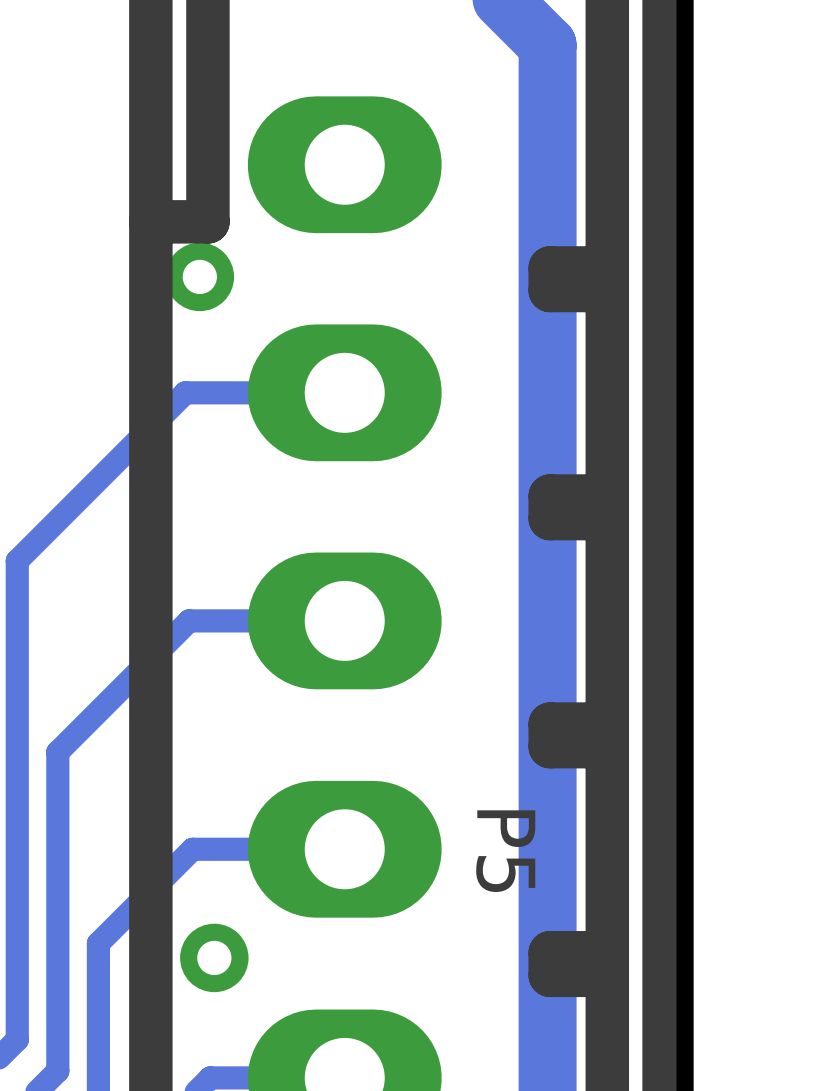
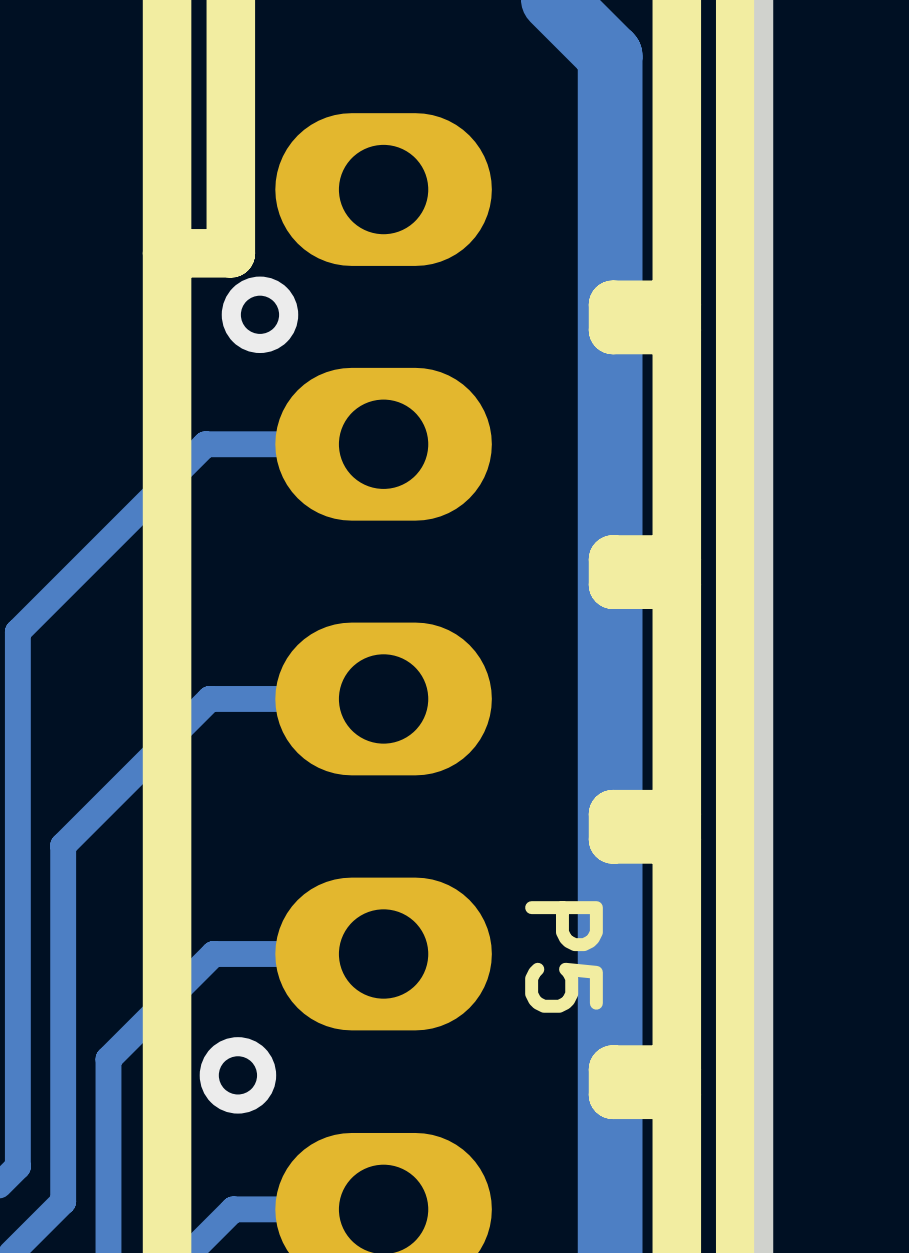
via position: (199, 276) -> (259, 314)

